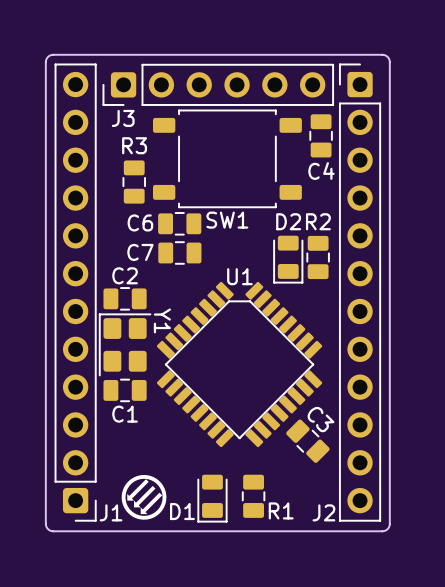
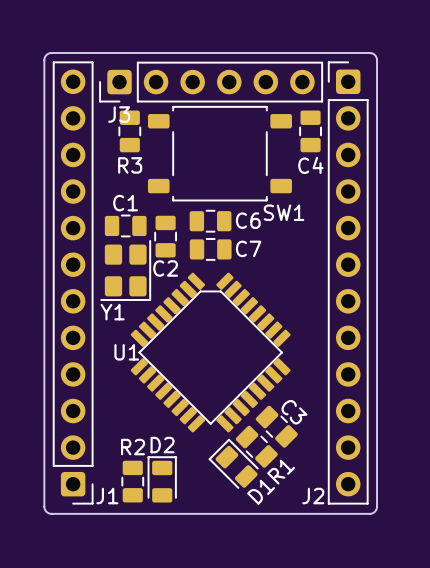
R3 name position: R3 (134, 145) -> R3 (130, 165)
R3 position: (134, 182) -> (129, 131)
SW1 name position: SW1 (227, 220) -> SW1 (283, 212)
C6 name position: C6 (140, 222) -> C6 (248, 220)
C6 position: (179, 223) -> (210, 221)
C7 name position: C7 (140, 252) -> C7 (248, 248)
C7 position: (179, 252) -> (210, 249)
R2 position: (318, 257) -> (132, 481)
D2 rotation: 0° (288, 259) -> 180° (162, 479)
D2 position: (288, 259) -> (162, 479)
C2 name position: C2 (125, 275) -> C2 (165, 268)
U1 name position: U1 (239, 276) -> U1 (126, 352)
C2 rotation: 0° (125, 298) -> 90° clockwise (165, 236)
C2 position: (125, 298) -> (165, 236)
Y1 name position: Y1 (162, 320) -> Y1 (112, 312)
Y1 rotation: 0° (125, 344) -> 180° (125, 270)
Y1 position: (125, 344) -> (125, 270)
U1 position: (239, 364) -> (210, 352)
C1 position: (125, 390) -> (125, 225)
C1 name position: C1 (125, 414) -> C1 (125, 203)
C3 name position: C3 (321, 419) -> C3 (294, 412)
C3 position: (307, 441) -> (276, 426)
drawing: [121, 475, 167, 520] -> none
R1 rotation: 0° (253, 496) -> 45° counterclockwise (256, 446)
R1 position: (253, 496) -> (256, 446)
D1 rotation: 0° (212, 498) -> 135° clockwise (233, 463)
D1 position: (212, 498) -> (233, 463)
D1 name position: D1 (182, 511) -> D1 (261, 492)

